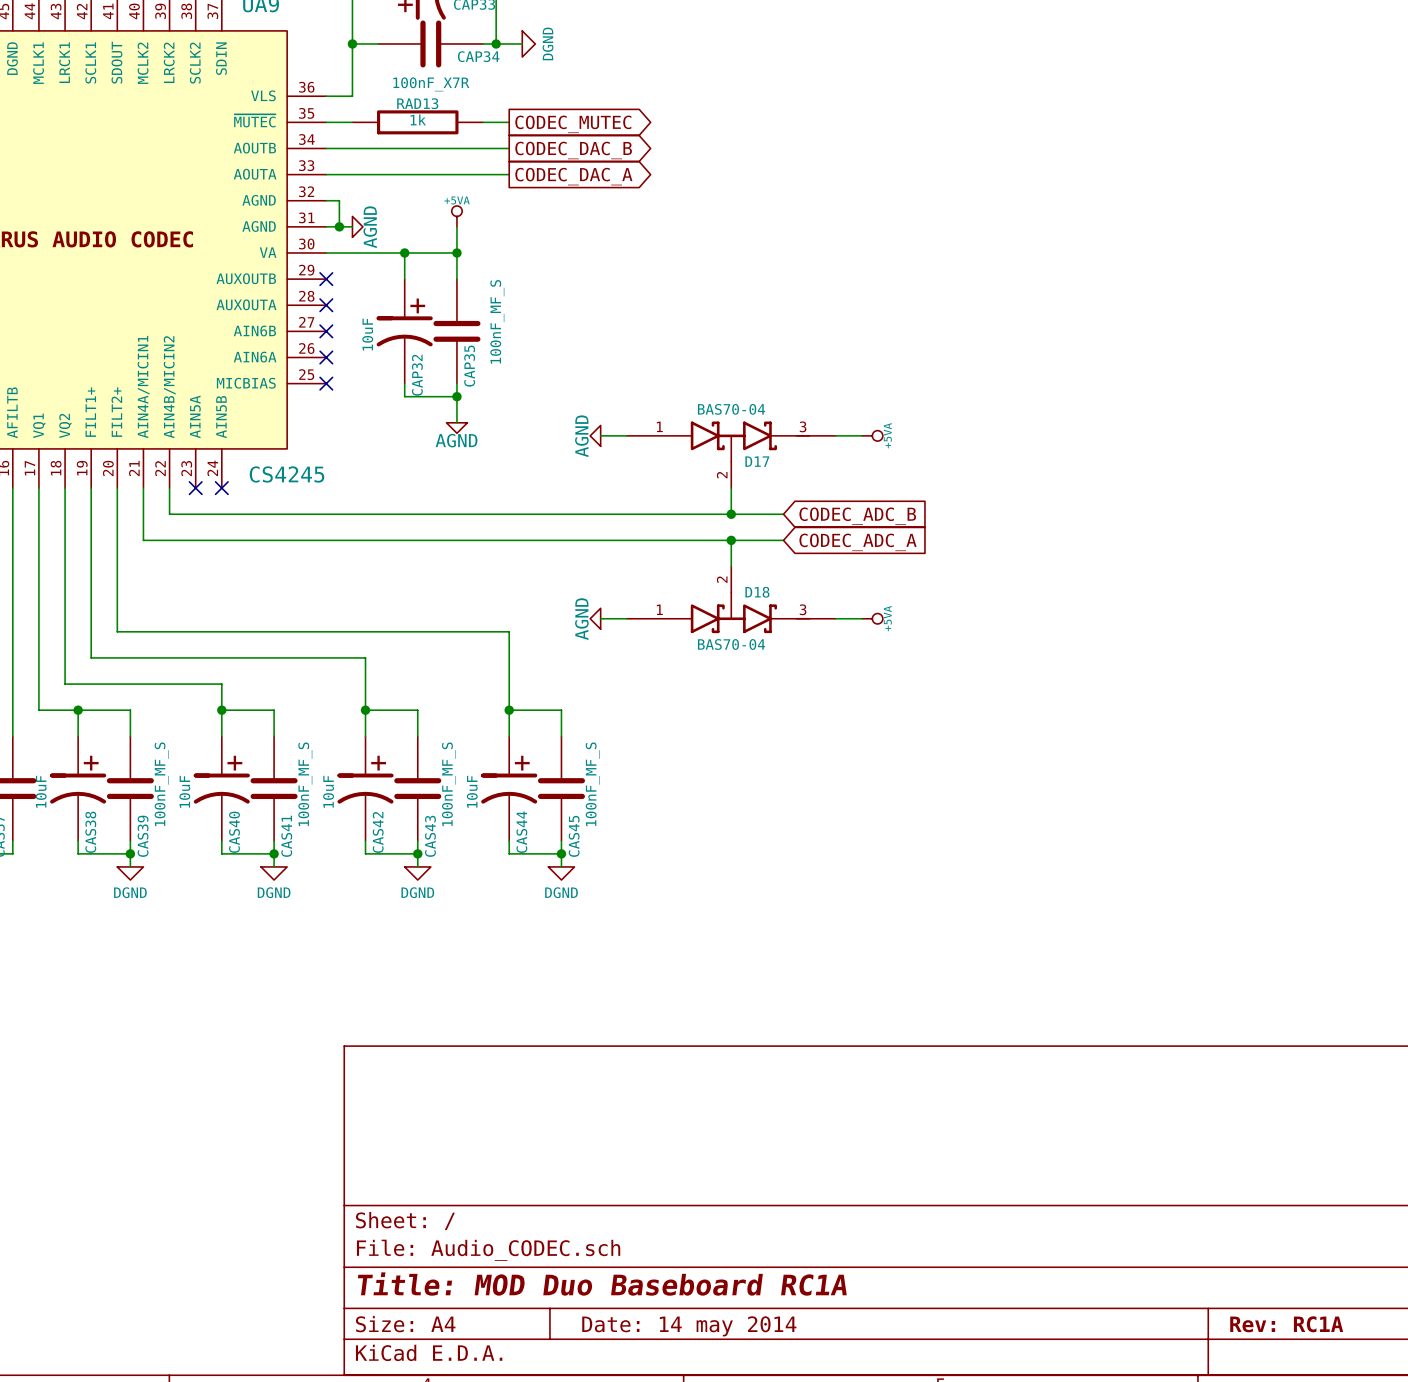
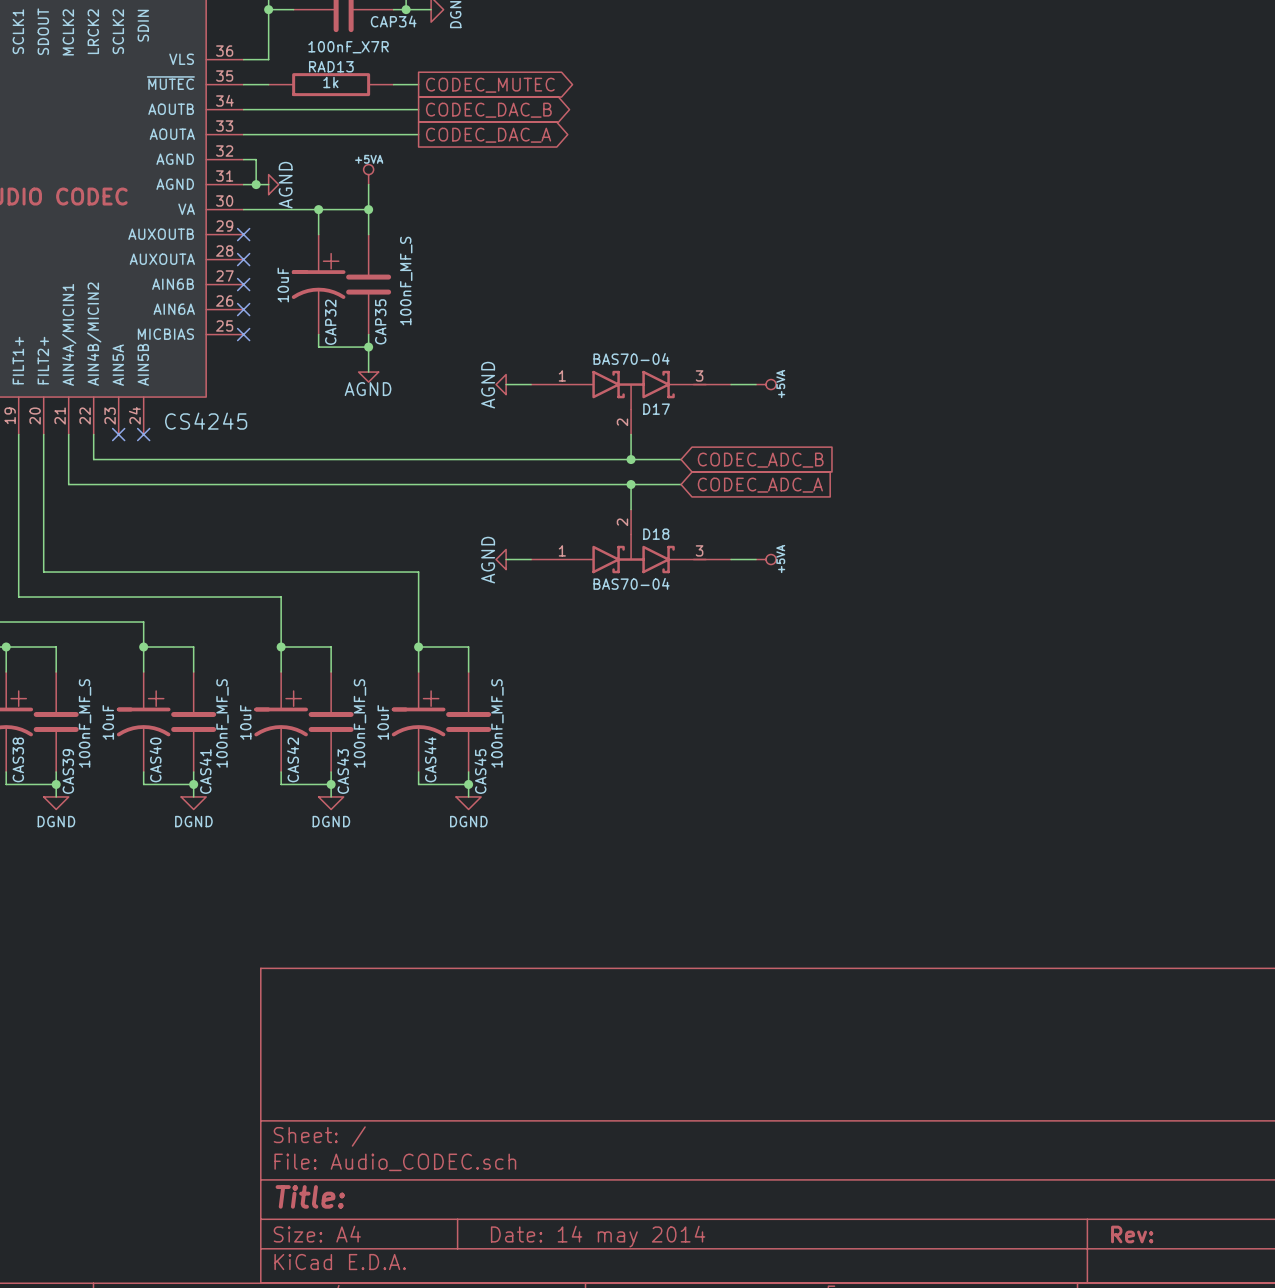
title block: Title: MOD Duo Baseboard RC1A (602, 1284) -> Title: (310, 1196)
title block: Rev: RC1A (1286, 1324) -> Rev: (1132, 1234)

